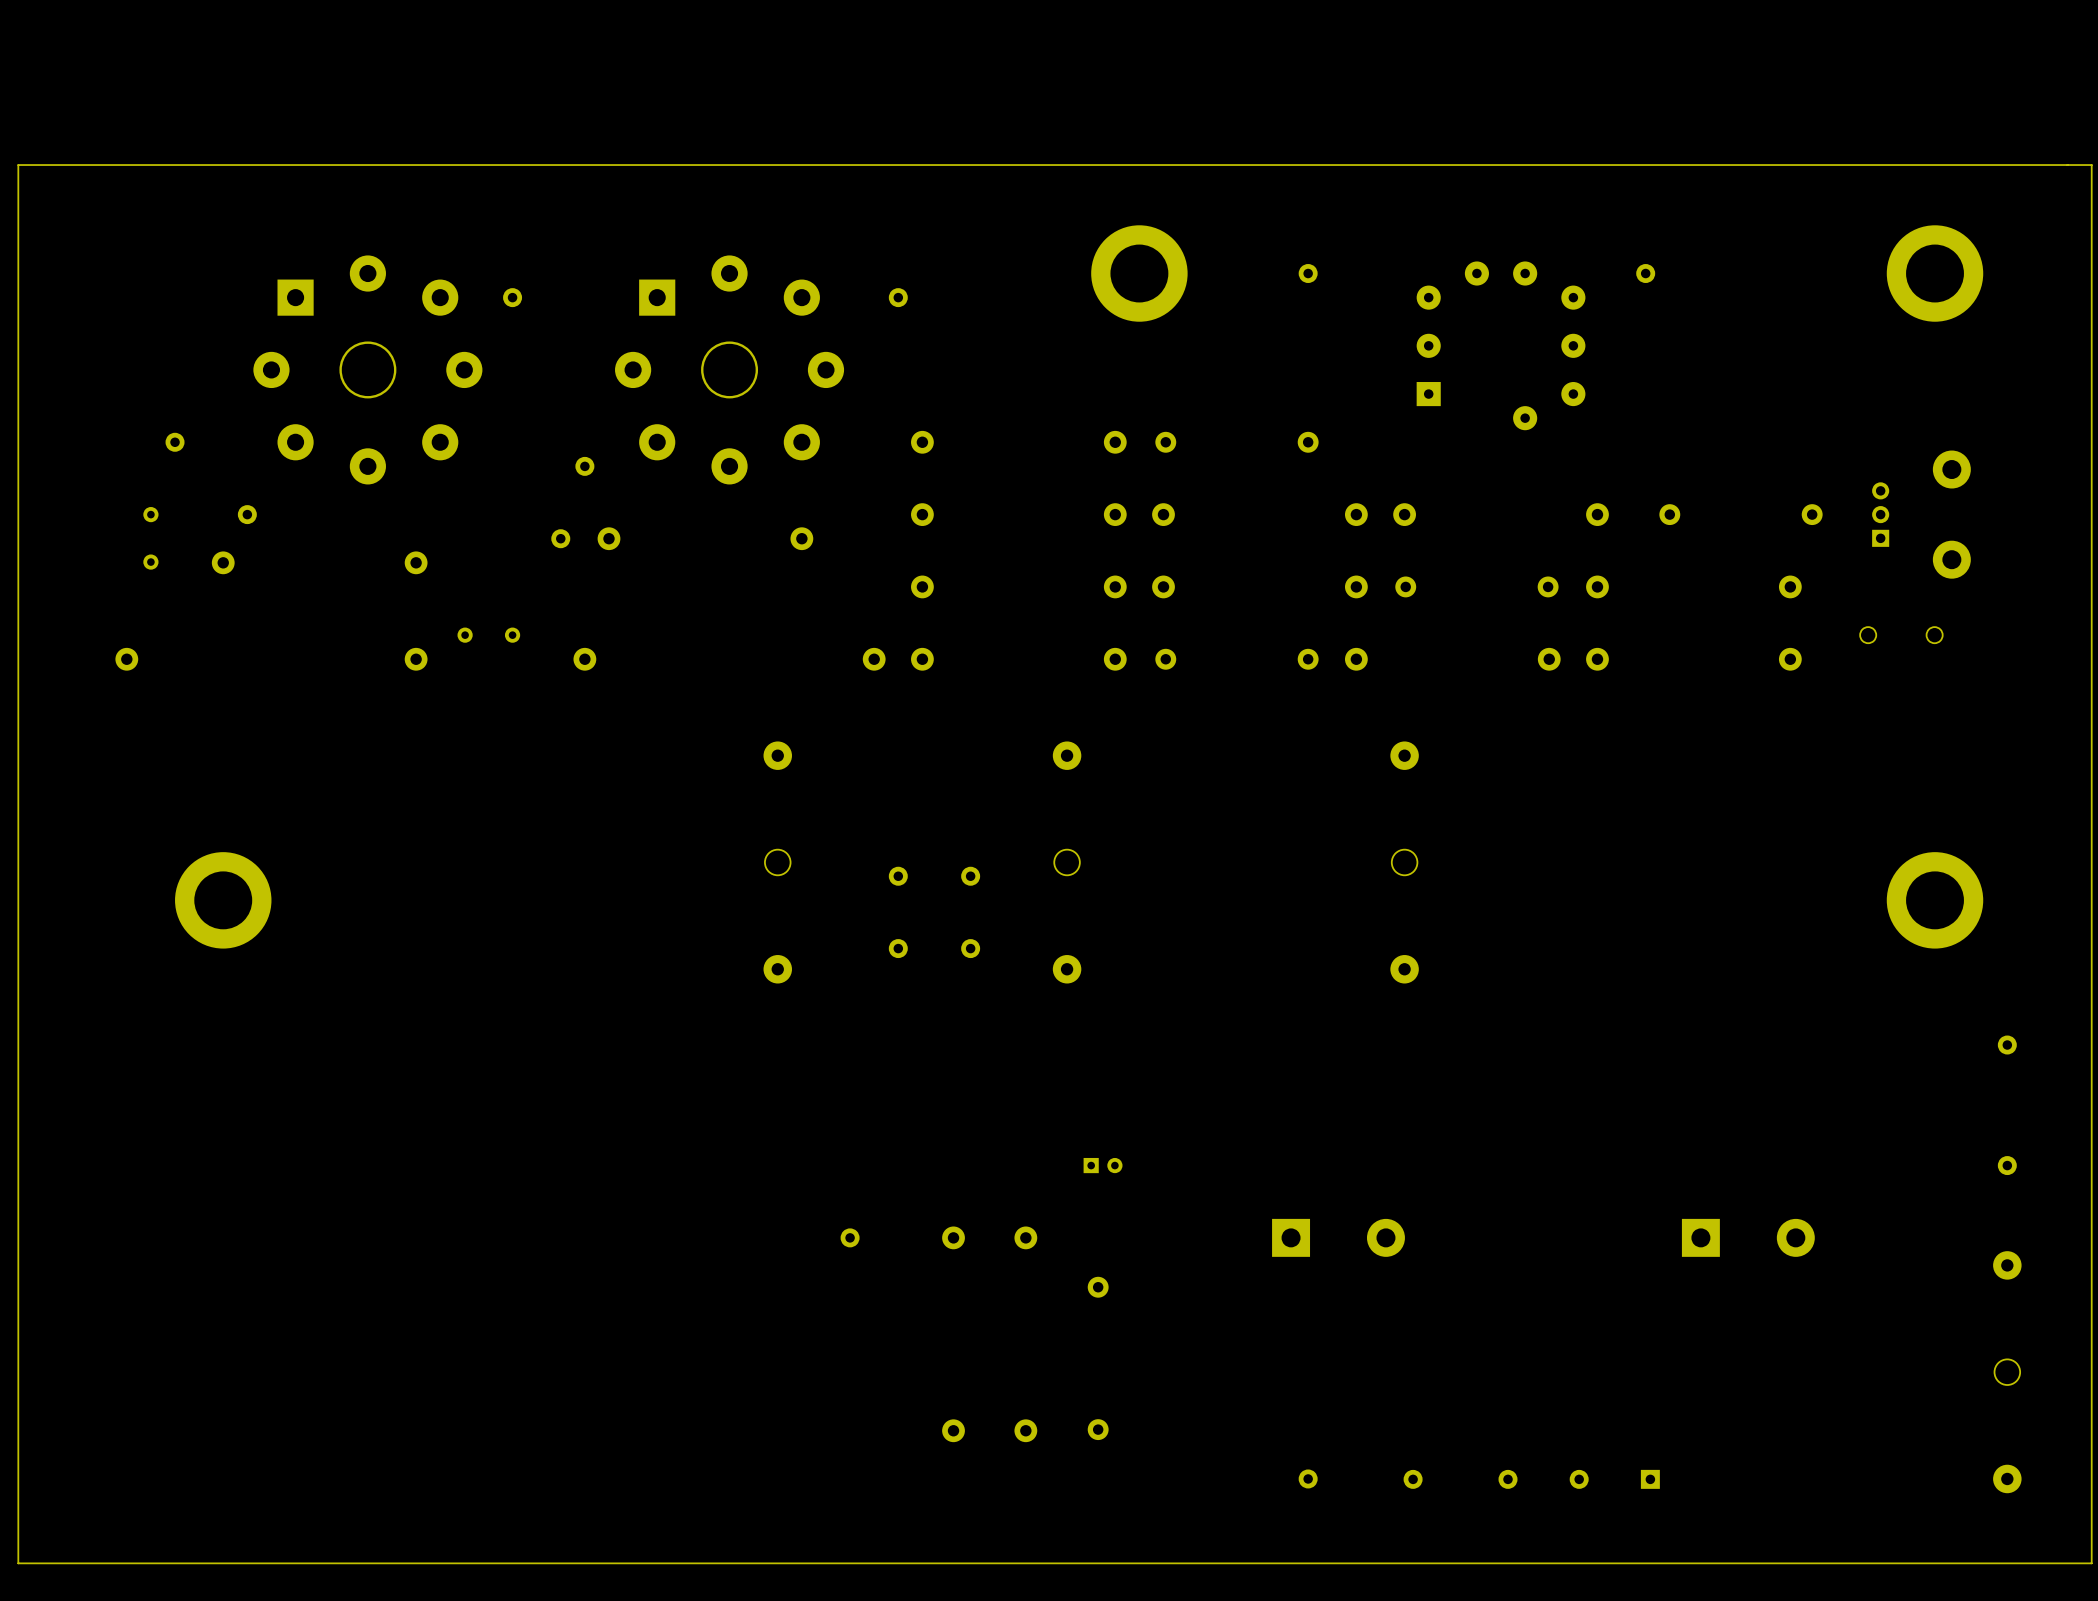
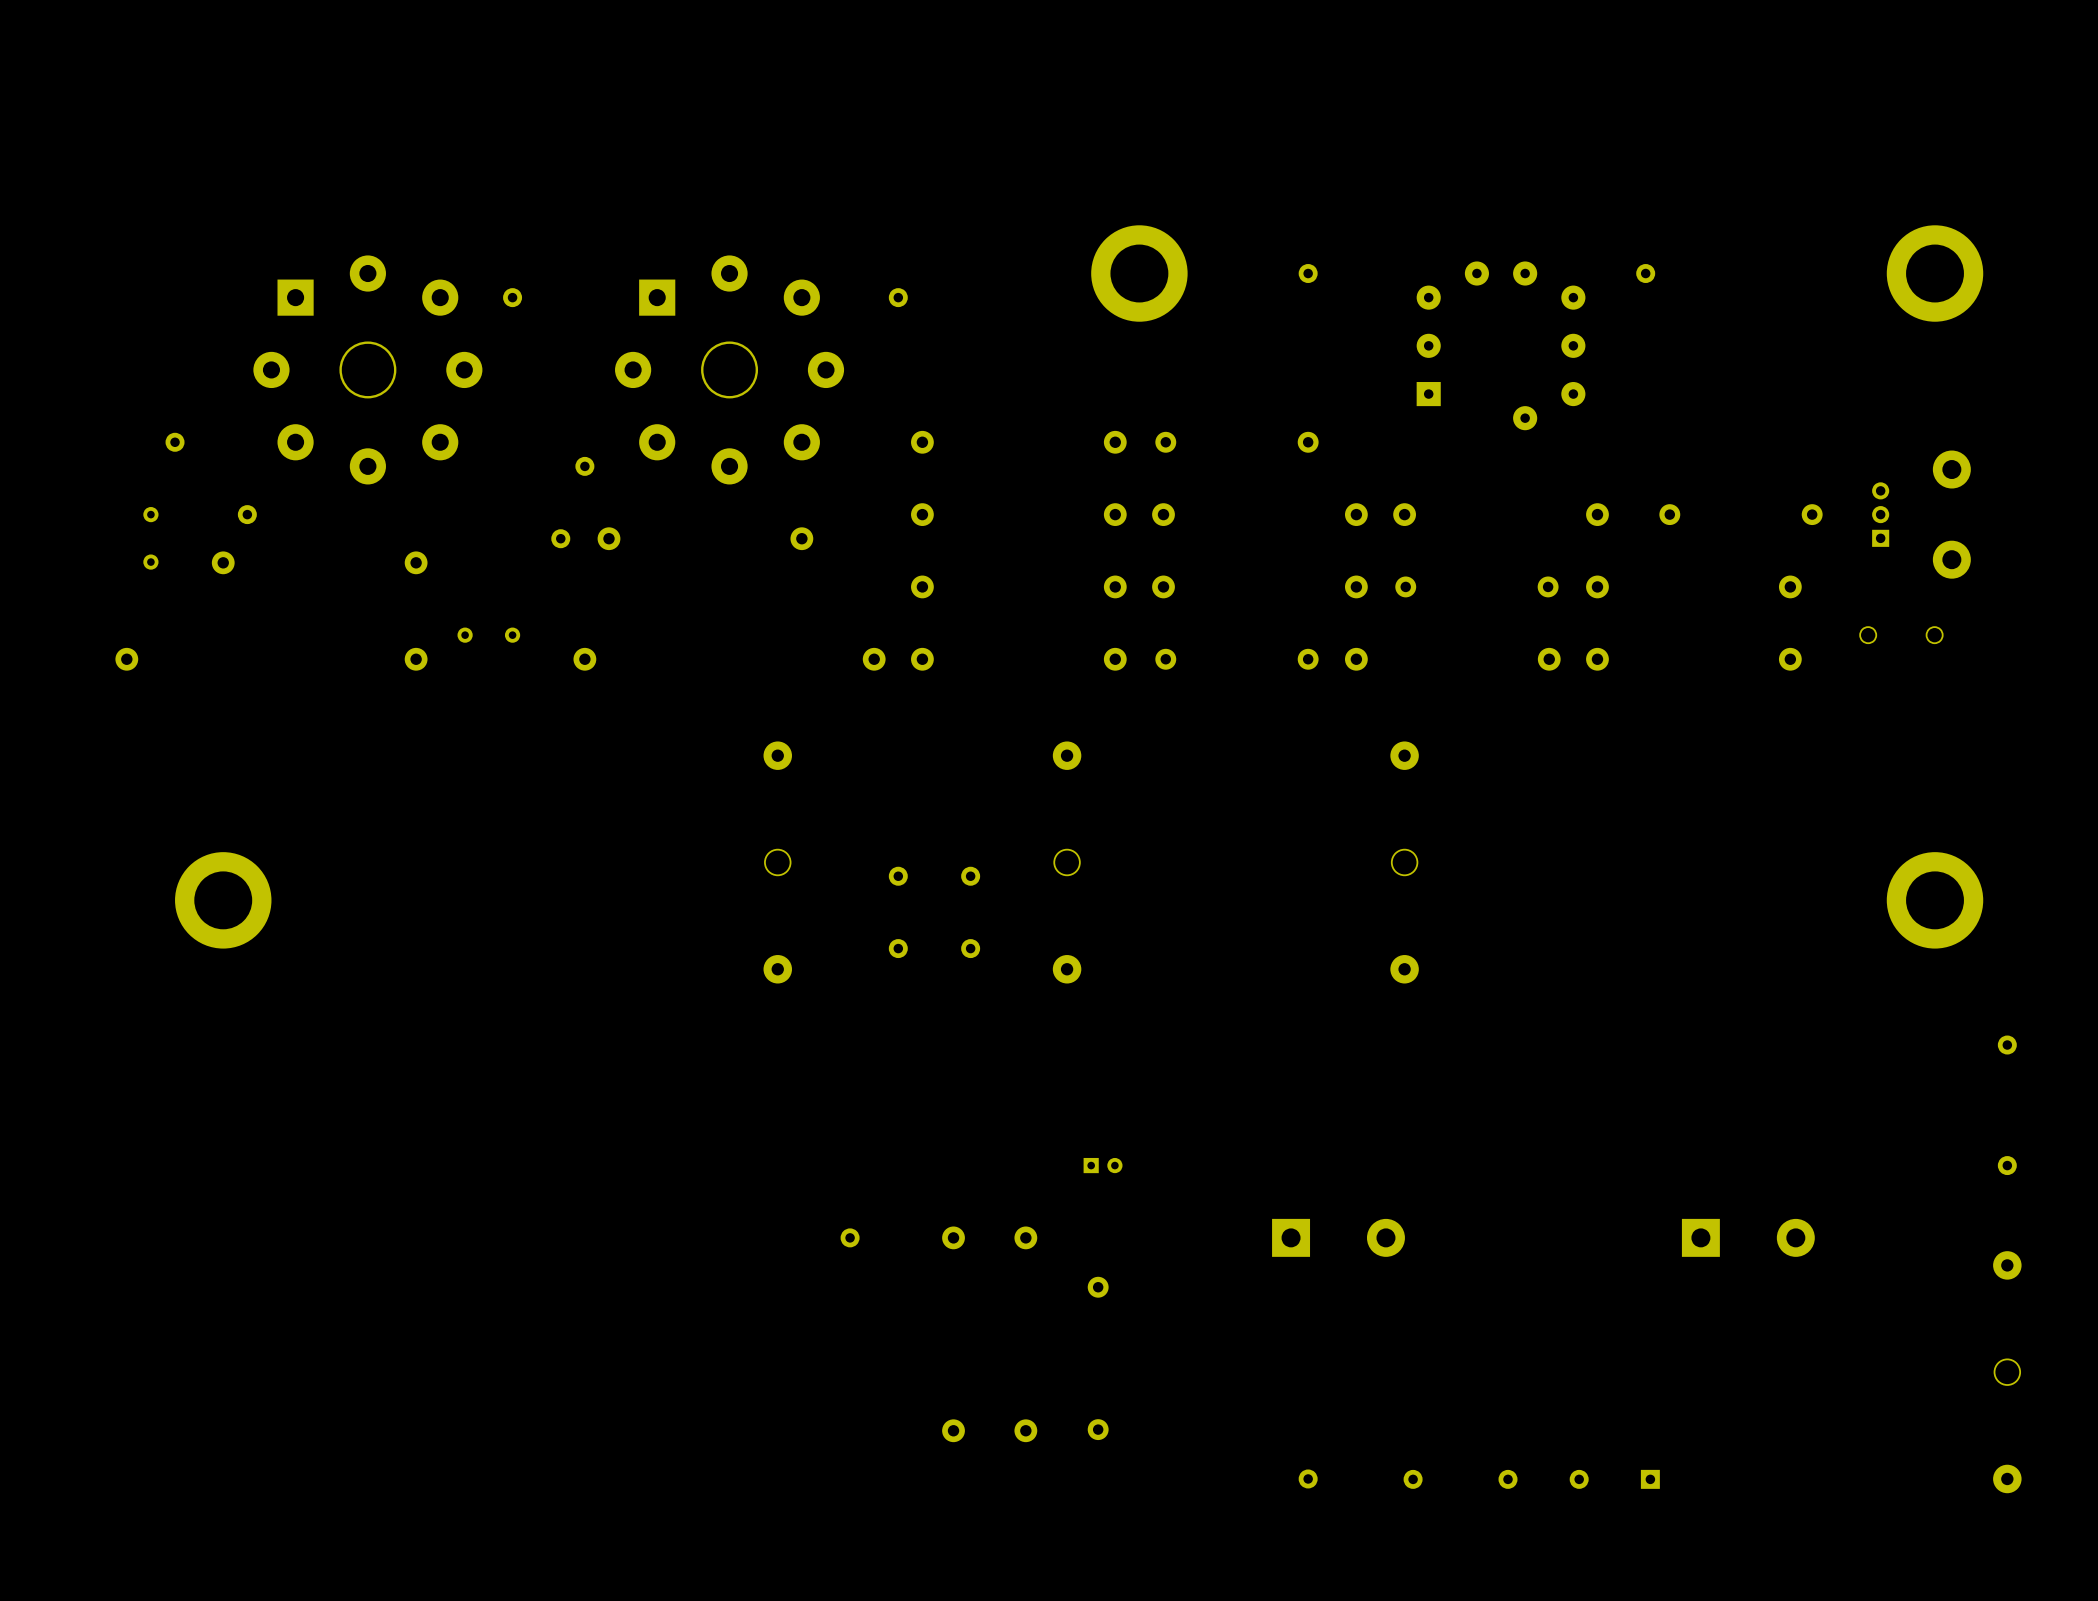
board edge: (2091, 165) (18, 165) (18, 1563) (2091, 1563) (2091, 165) -> none

